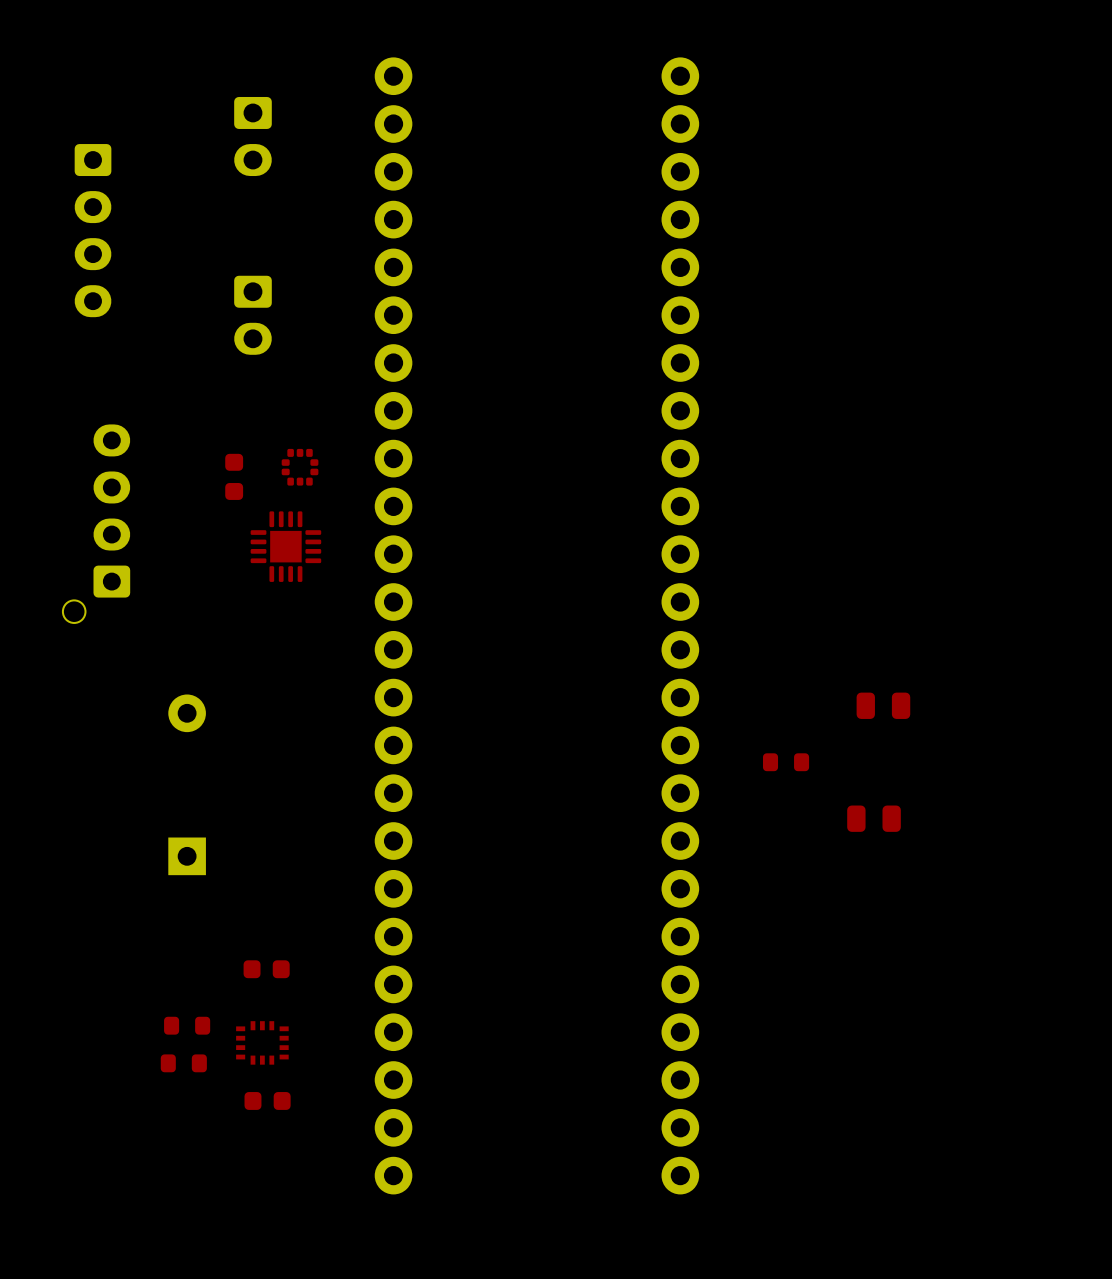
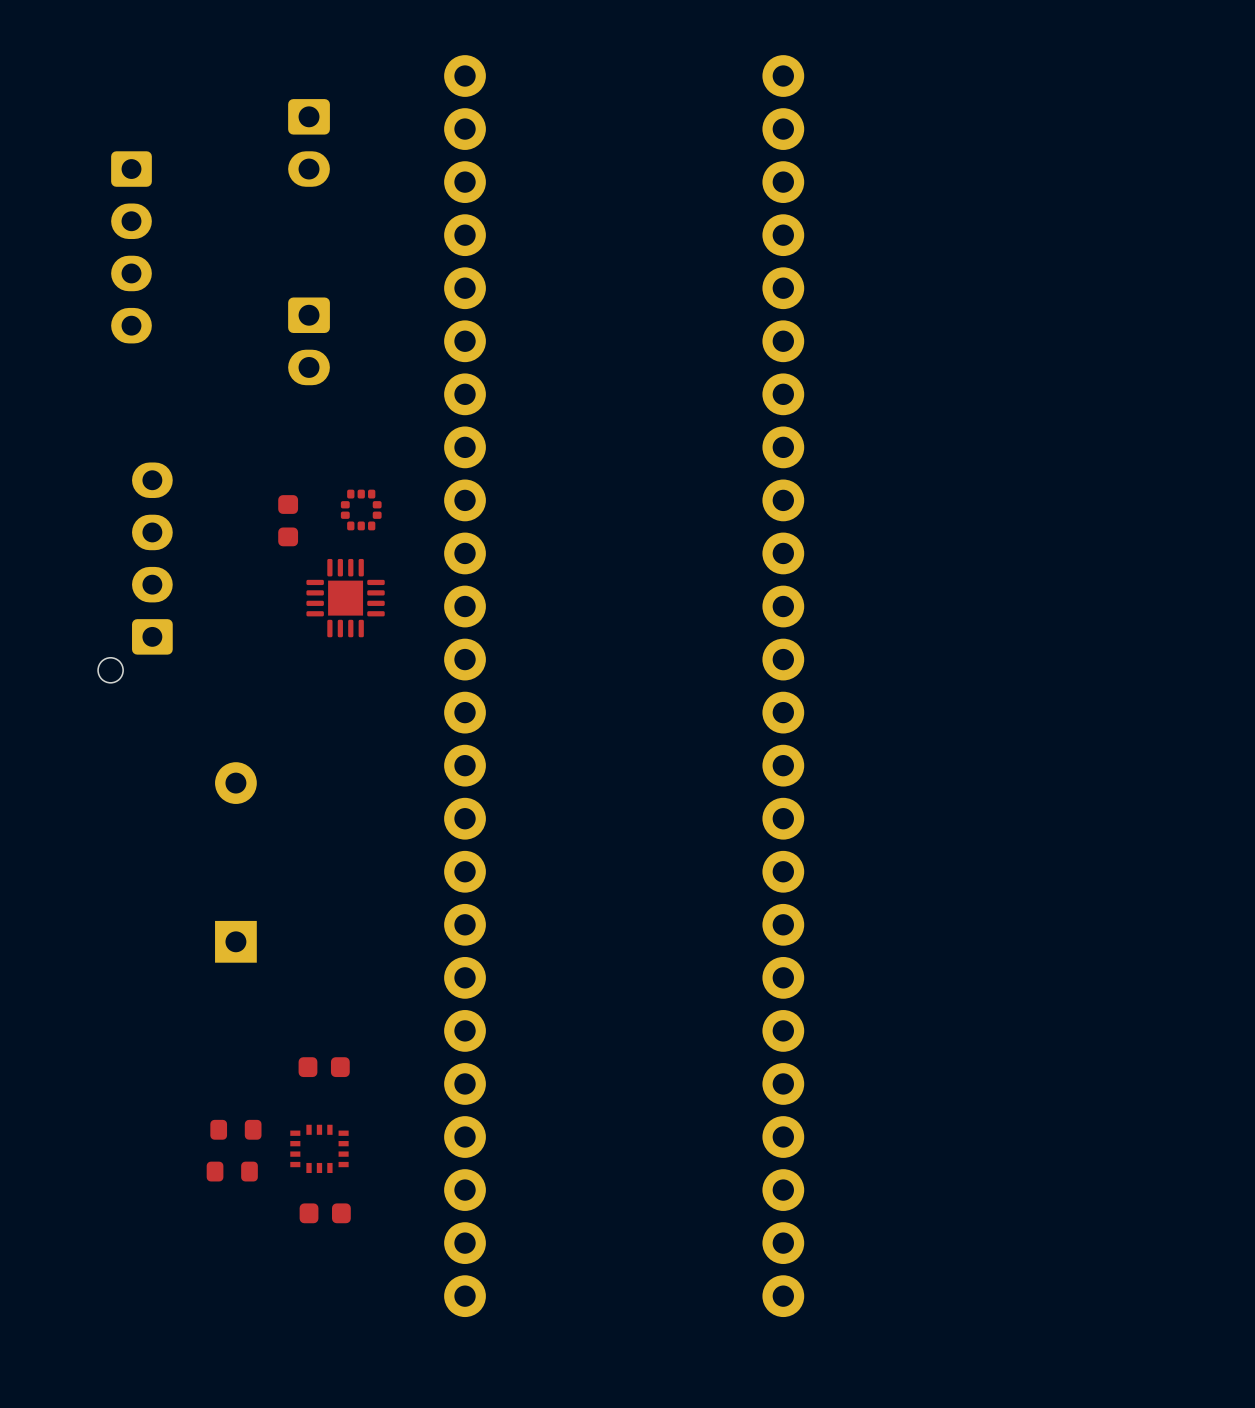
part: (883, 705) -> none
part: (786, 762) -> none
part: (874, 818) -> none

